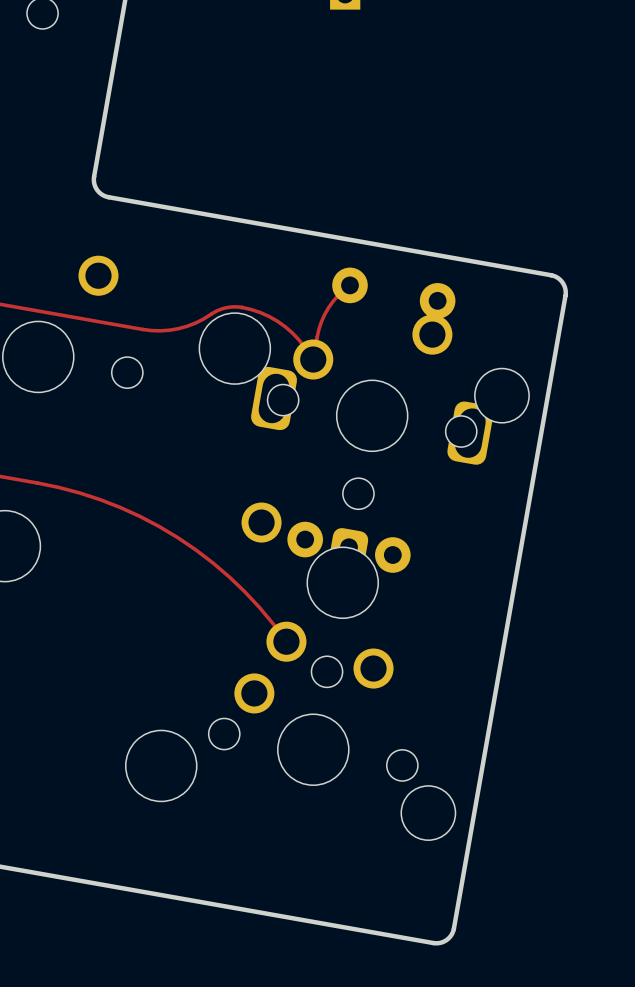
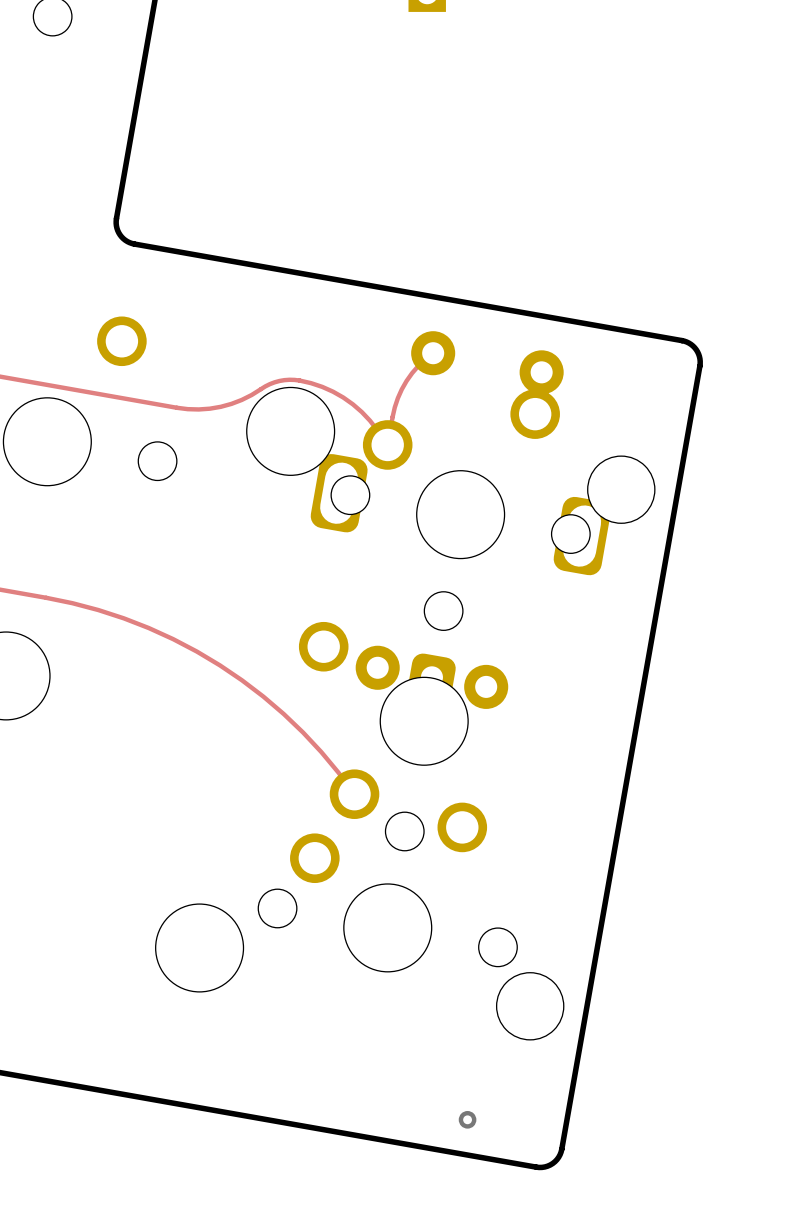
via: none -> (467, 1119)

